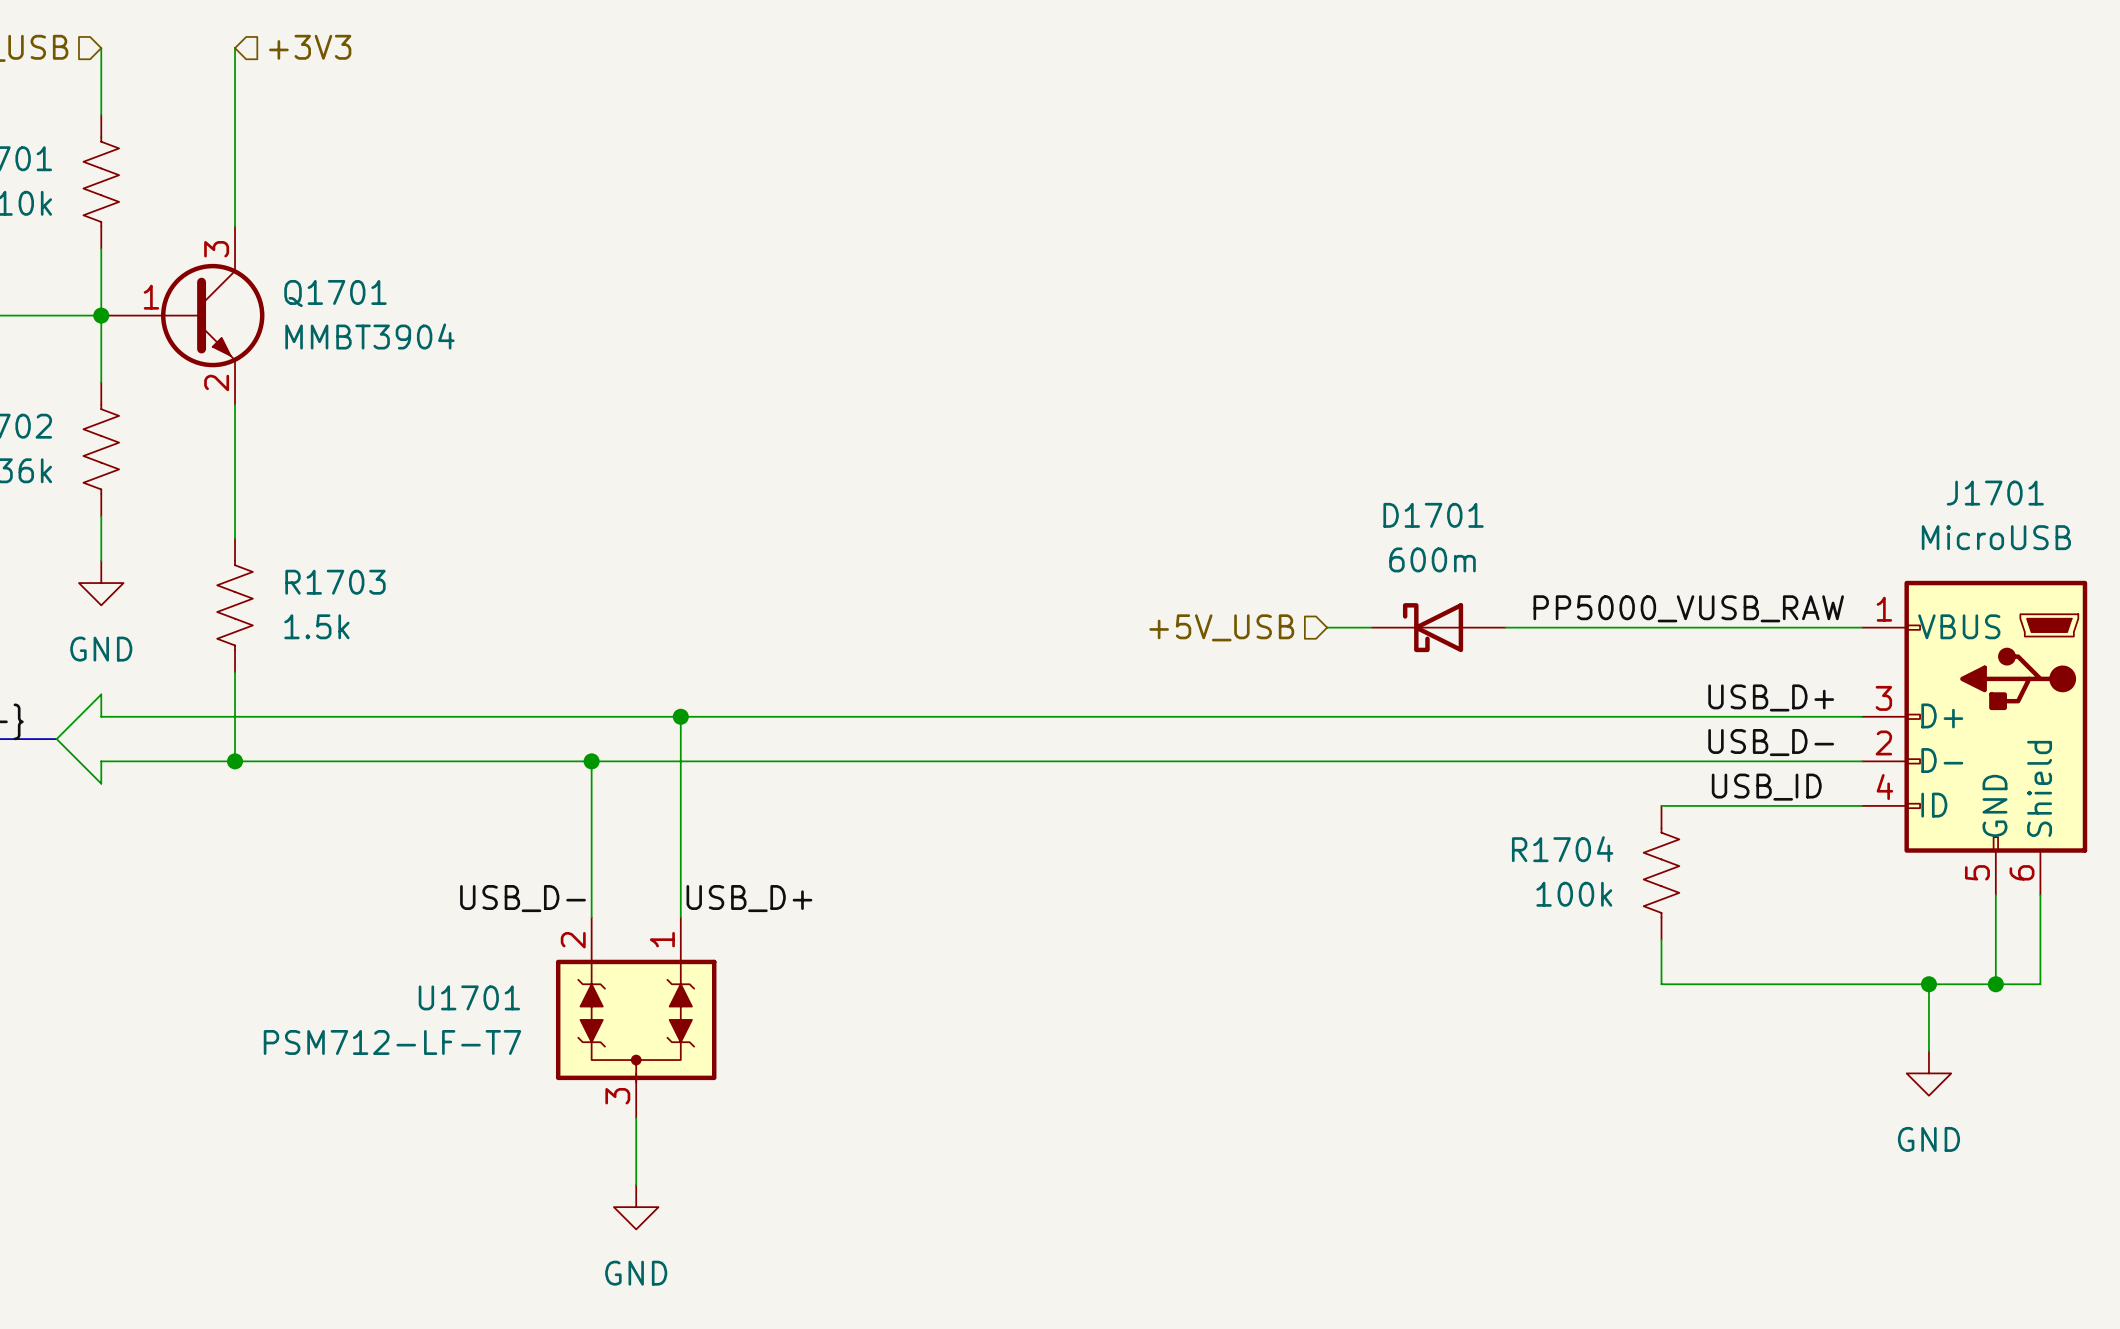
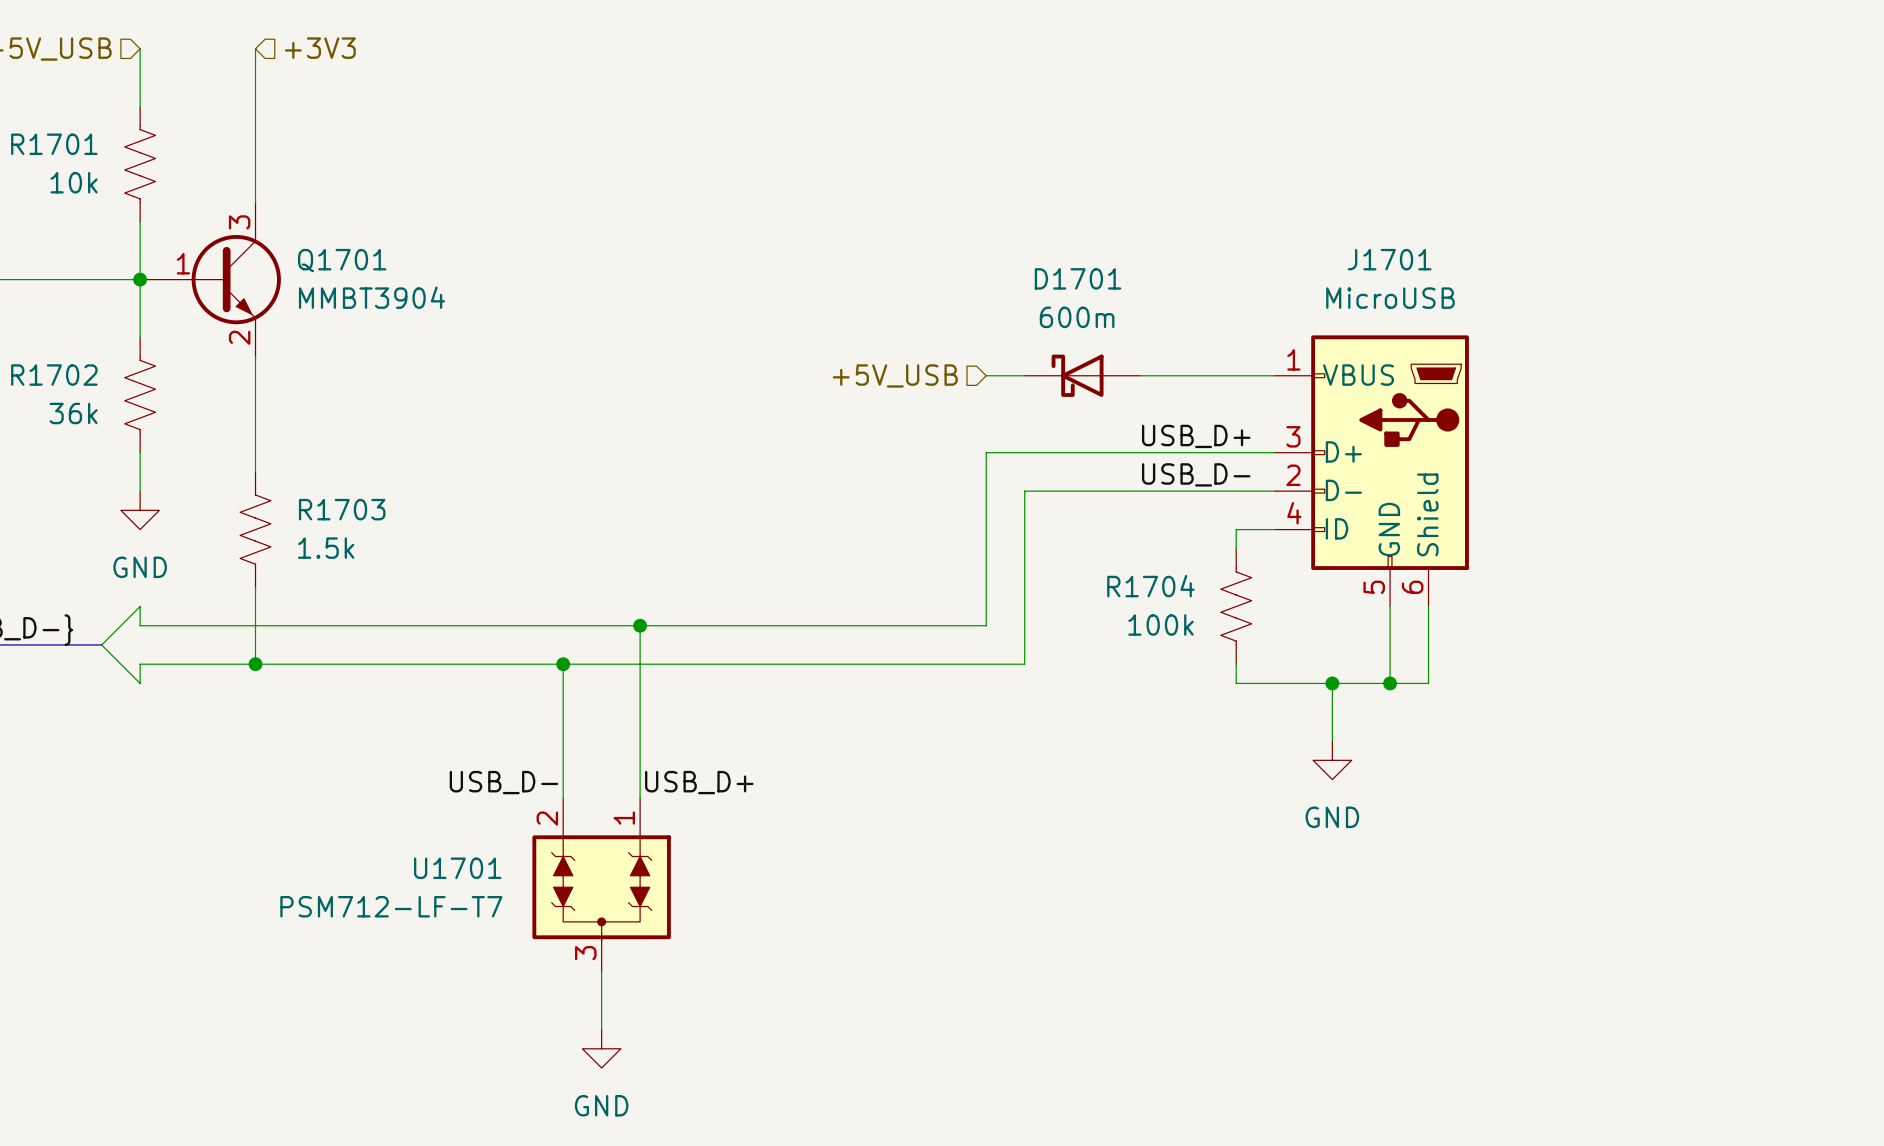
wire: none -> (986, 375) (1024, 375)
wire: none -> (1140, 375) (1274, 375)
label: none -> USB_D+ (1196, 436)
label: none -> USB_D- (1196, 474)
label: PP5000_VUSB_RAW (1688, 608) -> none
hierarchical label position: +5V_USB (1221, 627) -> +5V_USB (895, 375)
wire: (1327, 627) (1371, 627) -> (1274, 529) (1236, 529) (1236, 548)
D1701 position: (1438, 627) -> (1082, 375)
wire: (1505, 627) (1862, 627) -> none
wire: none -> (1390, 606) (1390, 683)
wire: none -> (1428, 606) (1428, 683) (1236, 683) (1236, 664)
label: USB_D+ (1771, 697) -> none
wire: (1081, 716) (1862, 716) -> (986, 625) (986, 452) (1274, 452)
J1701 position: (1974, 737) -> (1371, 470)
label: USB_D- (1771, 742) -> none
wire: (1126, 761) (1862, 761) -> (1024, 664) (1024, 491) (1274, 491)
wire: none -> (1332, 683) (1332, 741)
junction: none -> (1332, 683)
junction: none -> (1390, 683)
label: USB_ID (1766, 787) -> none
wire: (1661, 805) (1862, 805) -> none
power symbol: none -> GND (1332, 760)
R1704 position: (1661, 872) -> (1236, 606)
wire: (1995, 895) (1995, 984) -> none
wire: (2040, 895) (2040, 984) (1661, 984) (1661, 939) -> none
wire: (1928, 984) (1928, 1051) -> none
junction: (1928, 984) -> none
junction: (1995, 984) -> none
power symbol: GND (1928, 1073) -> none

